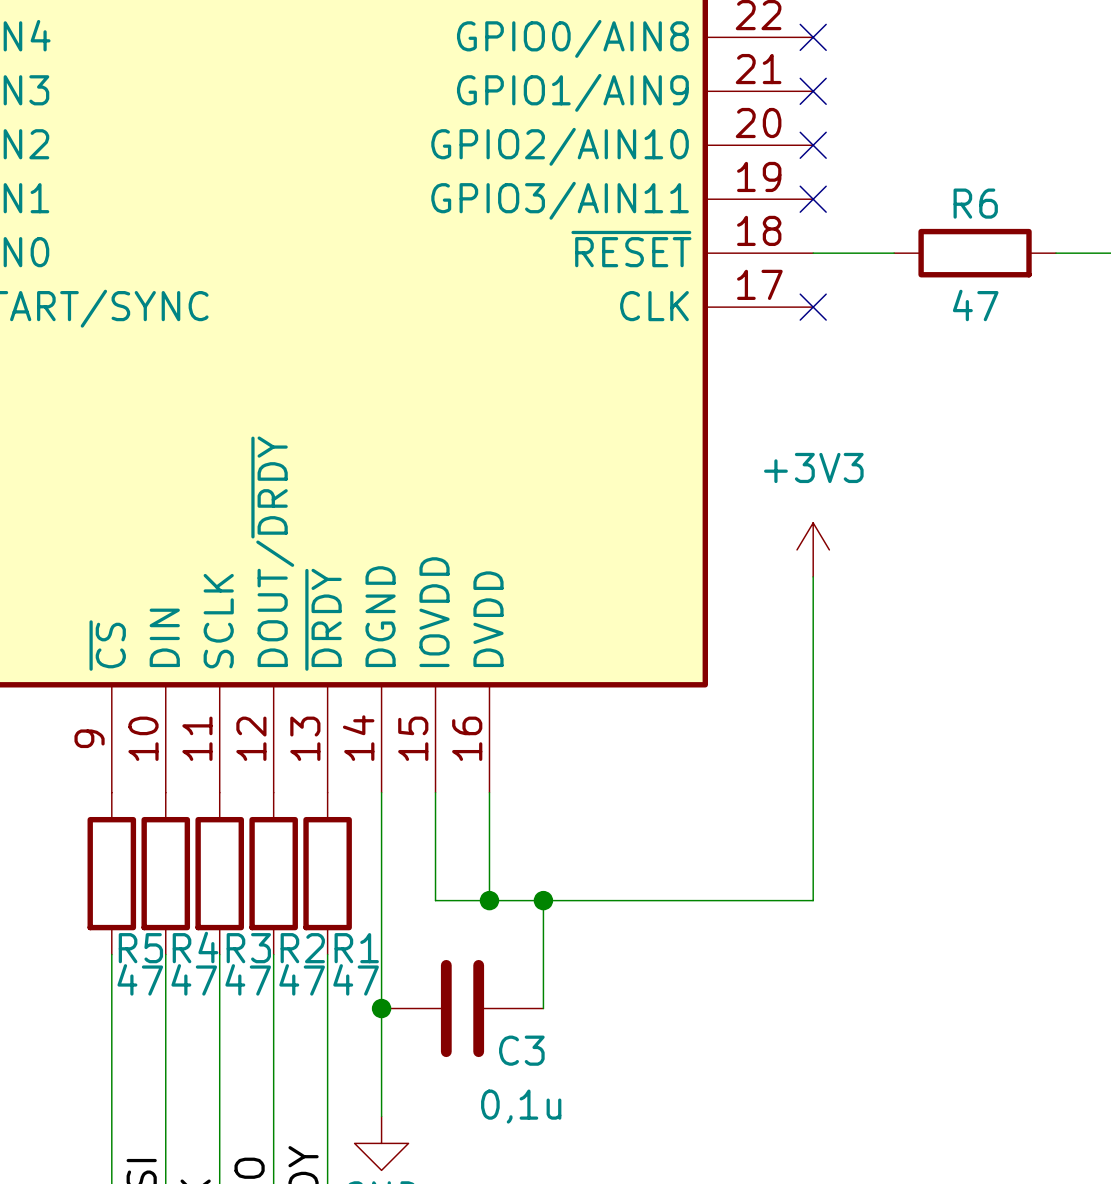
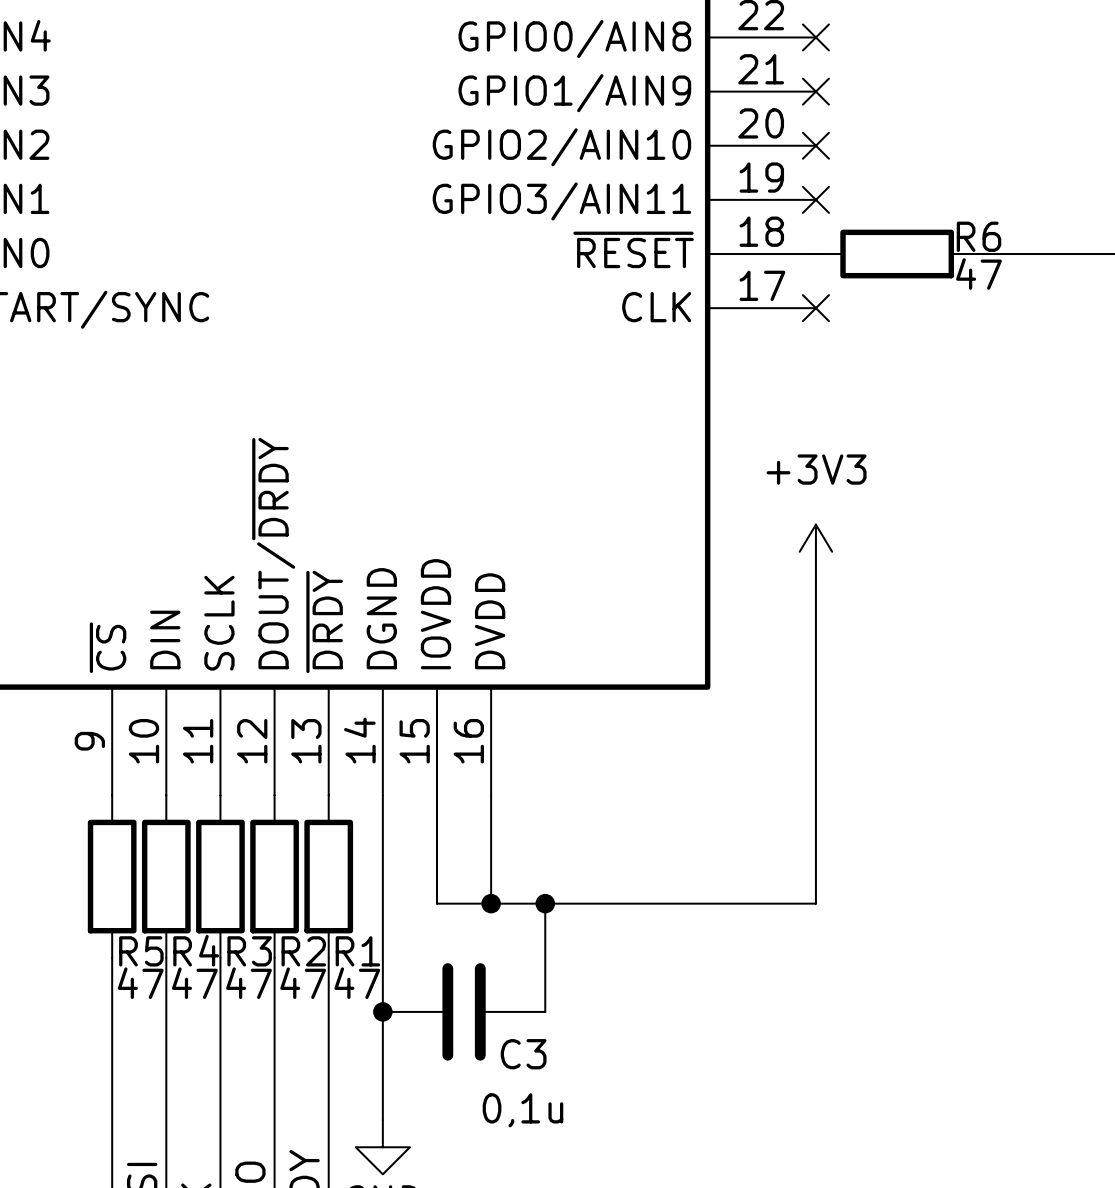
R6 name position: R6 (975, 203) -> R6 (978, 236)
wire: (813, 253) (894, 253) -> (978, 254) (1059, 254)
R6 position: (975, 253) -> (897, 254)
R6 value position: 47 (975, 305) -> 47 (978, 274)

